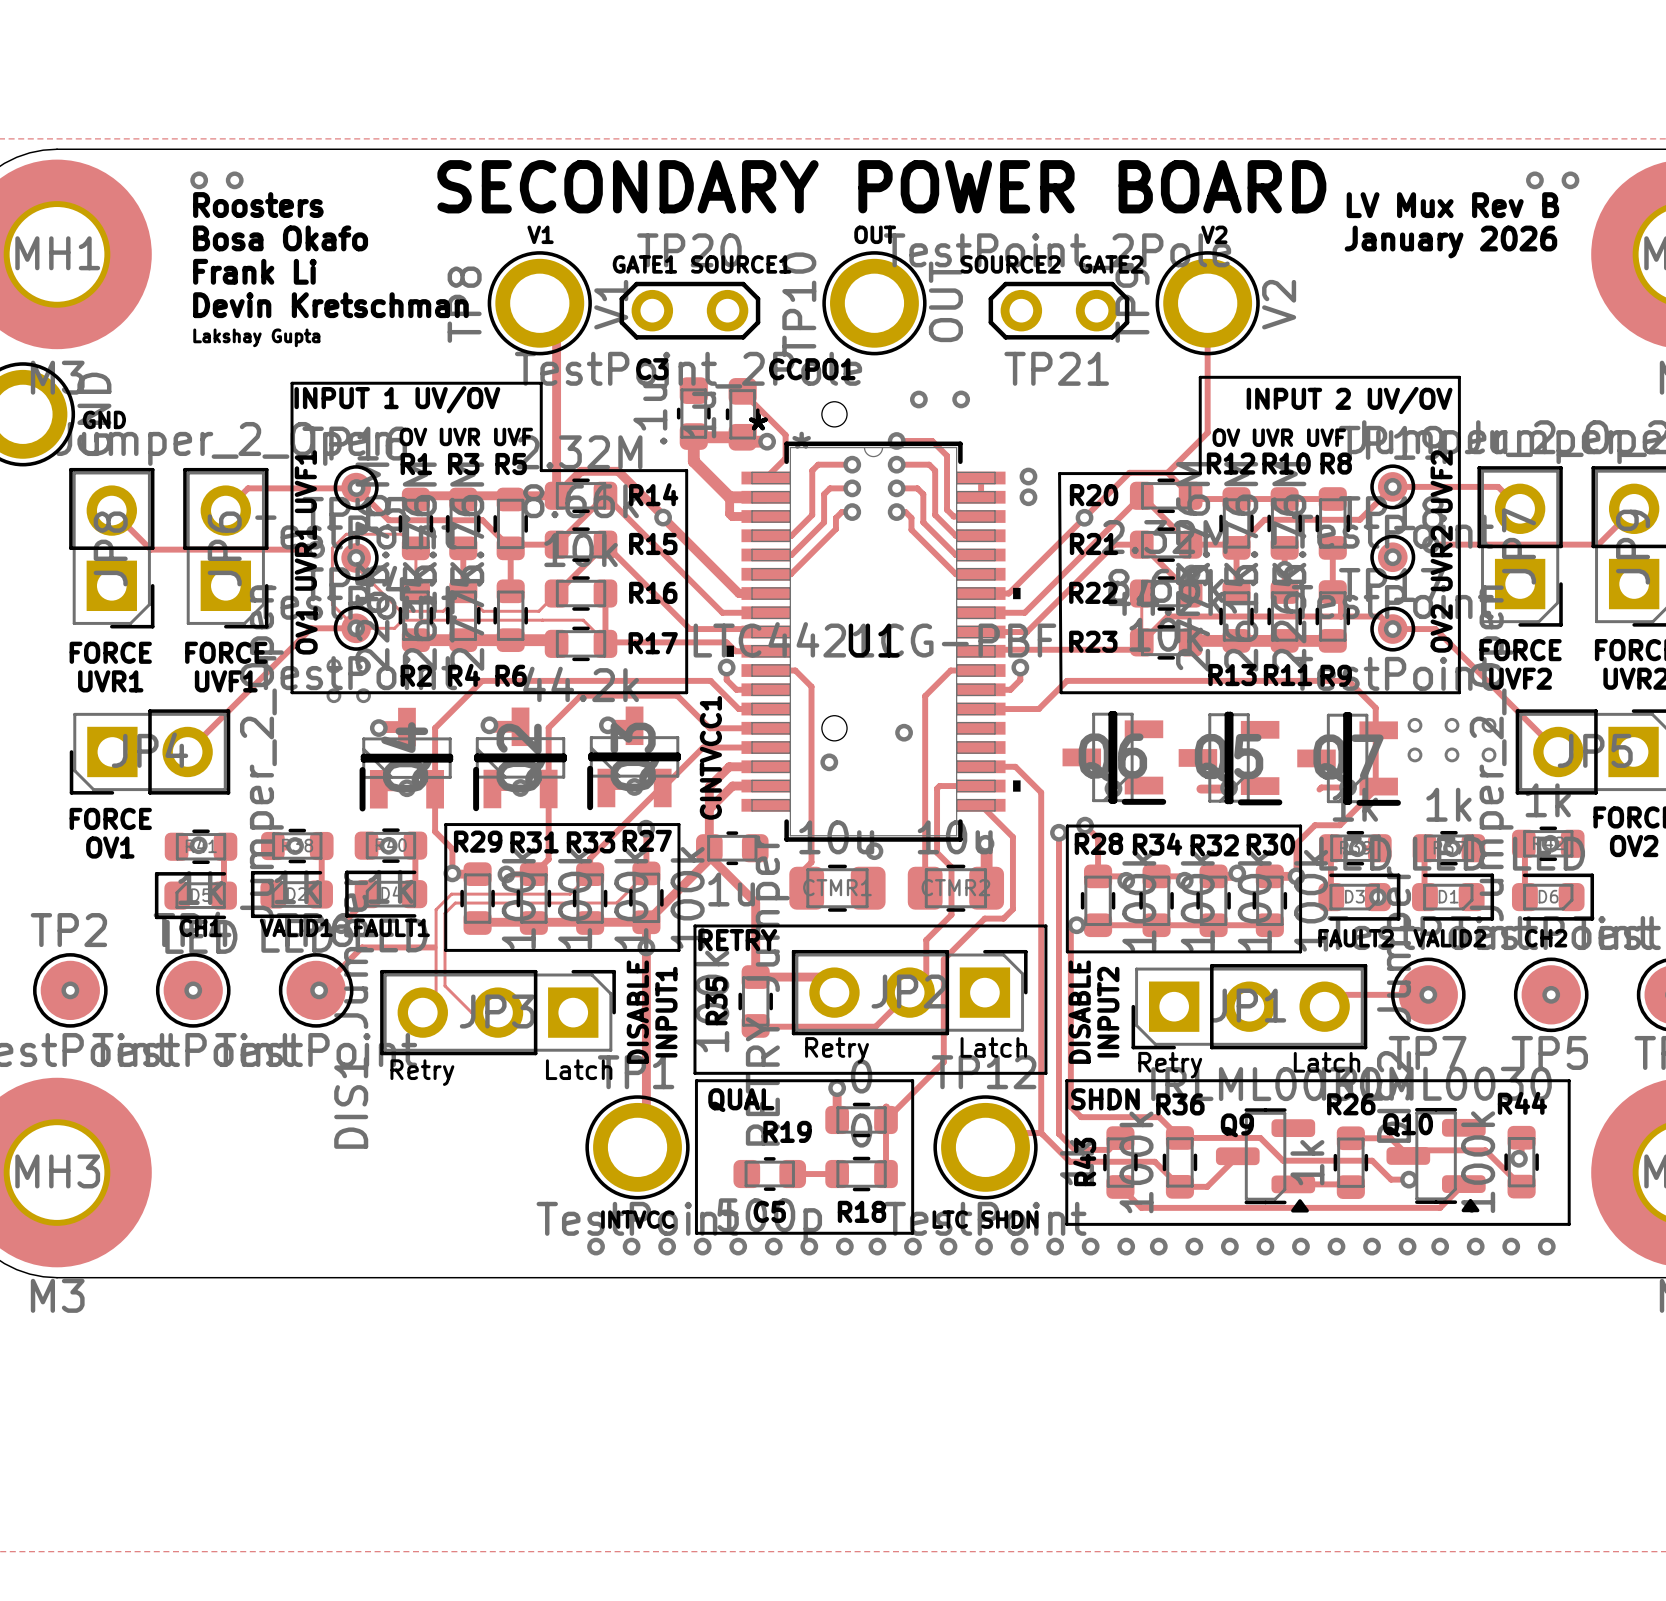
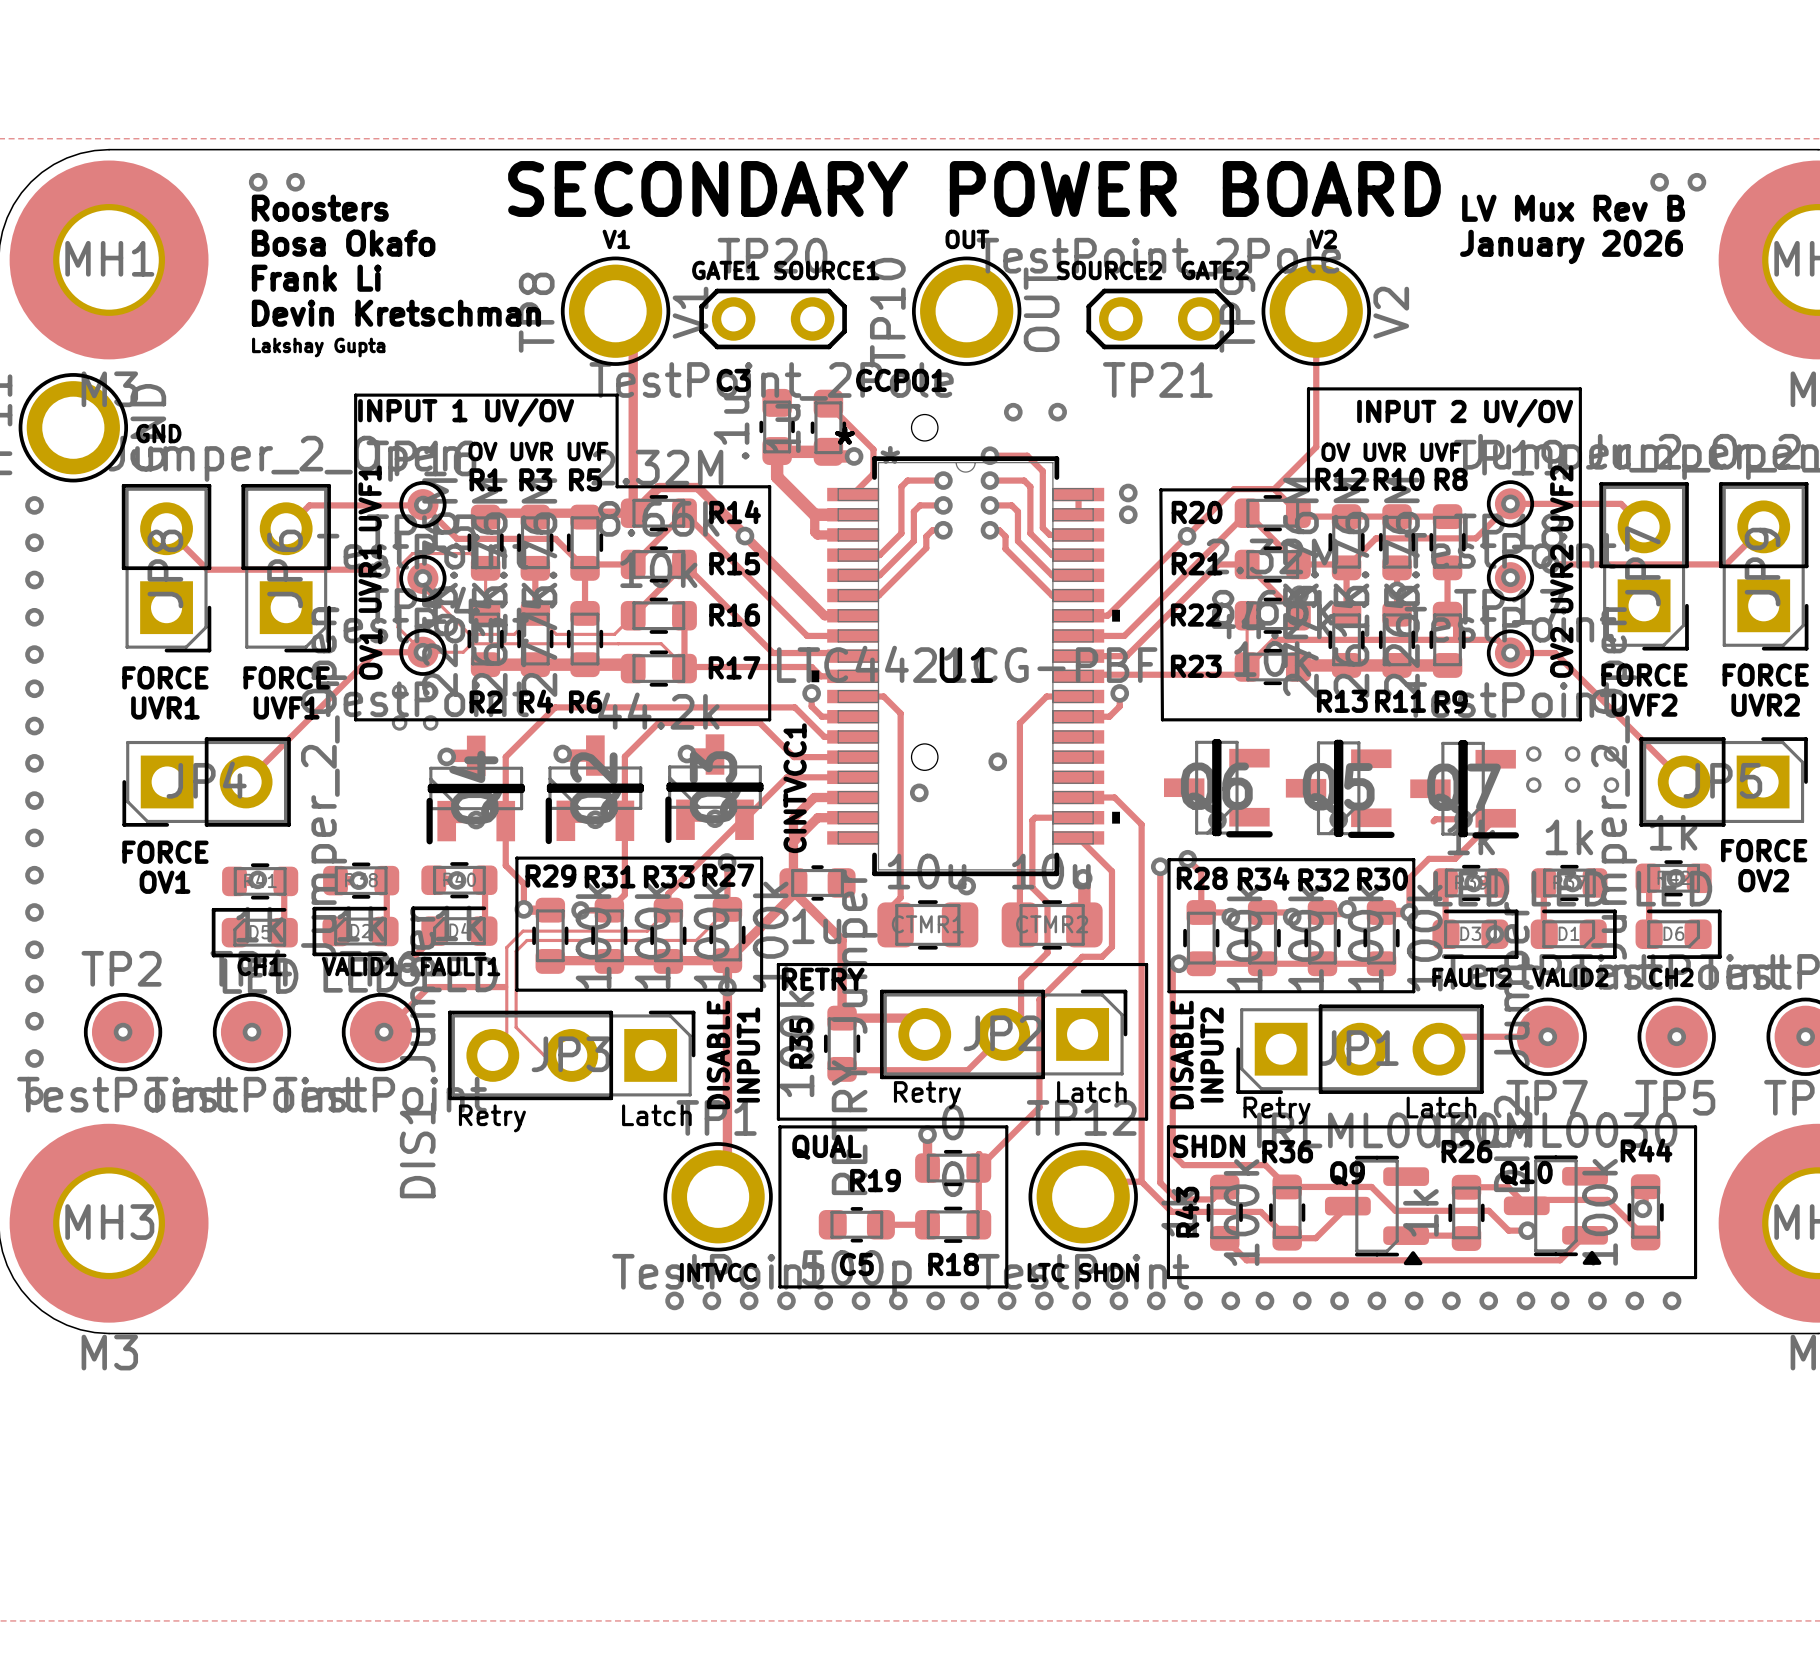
track: (981, 709) (1038, 709) (1066, 680) (1348, 680) (1375, 708) (1375, 789) -> none
track: (1229, 788) (1200, 789) -> none

